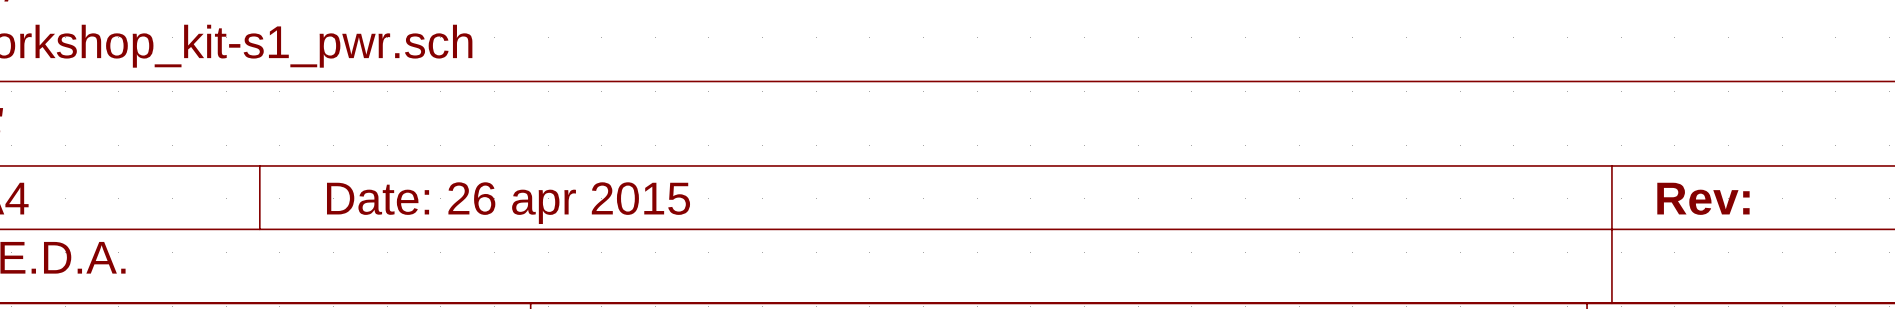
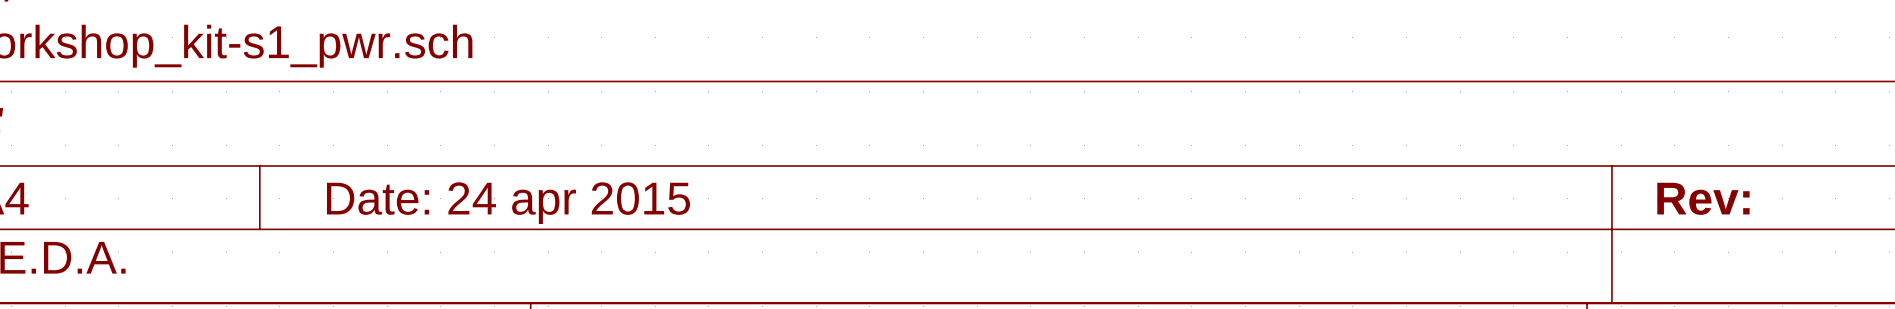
title block: Date: 26 apr 2015 (508, 203) -> Date: 24 apr 2015 (508, 203)

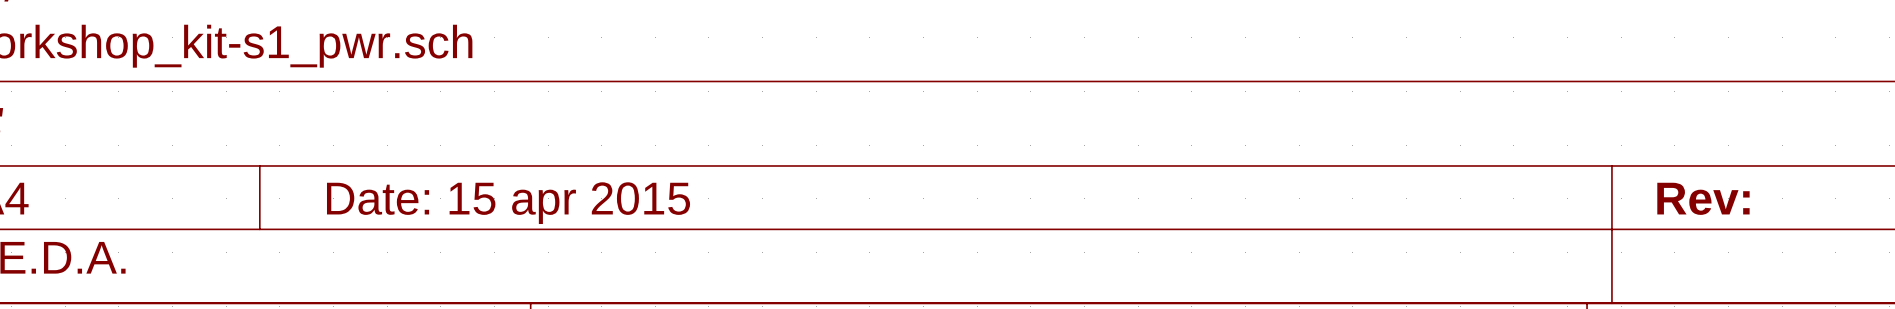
title block: Date: 24 apr 2015 (508, 203) -> Date: 15 apr 2015 (508, 203)

